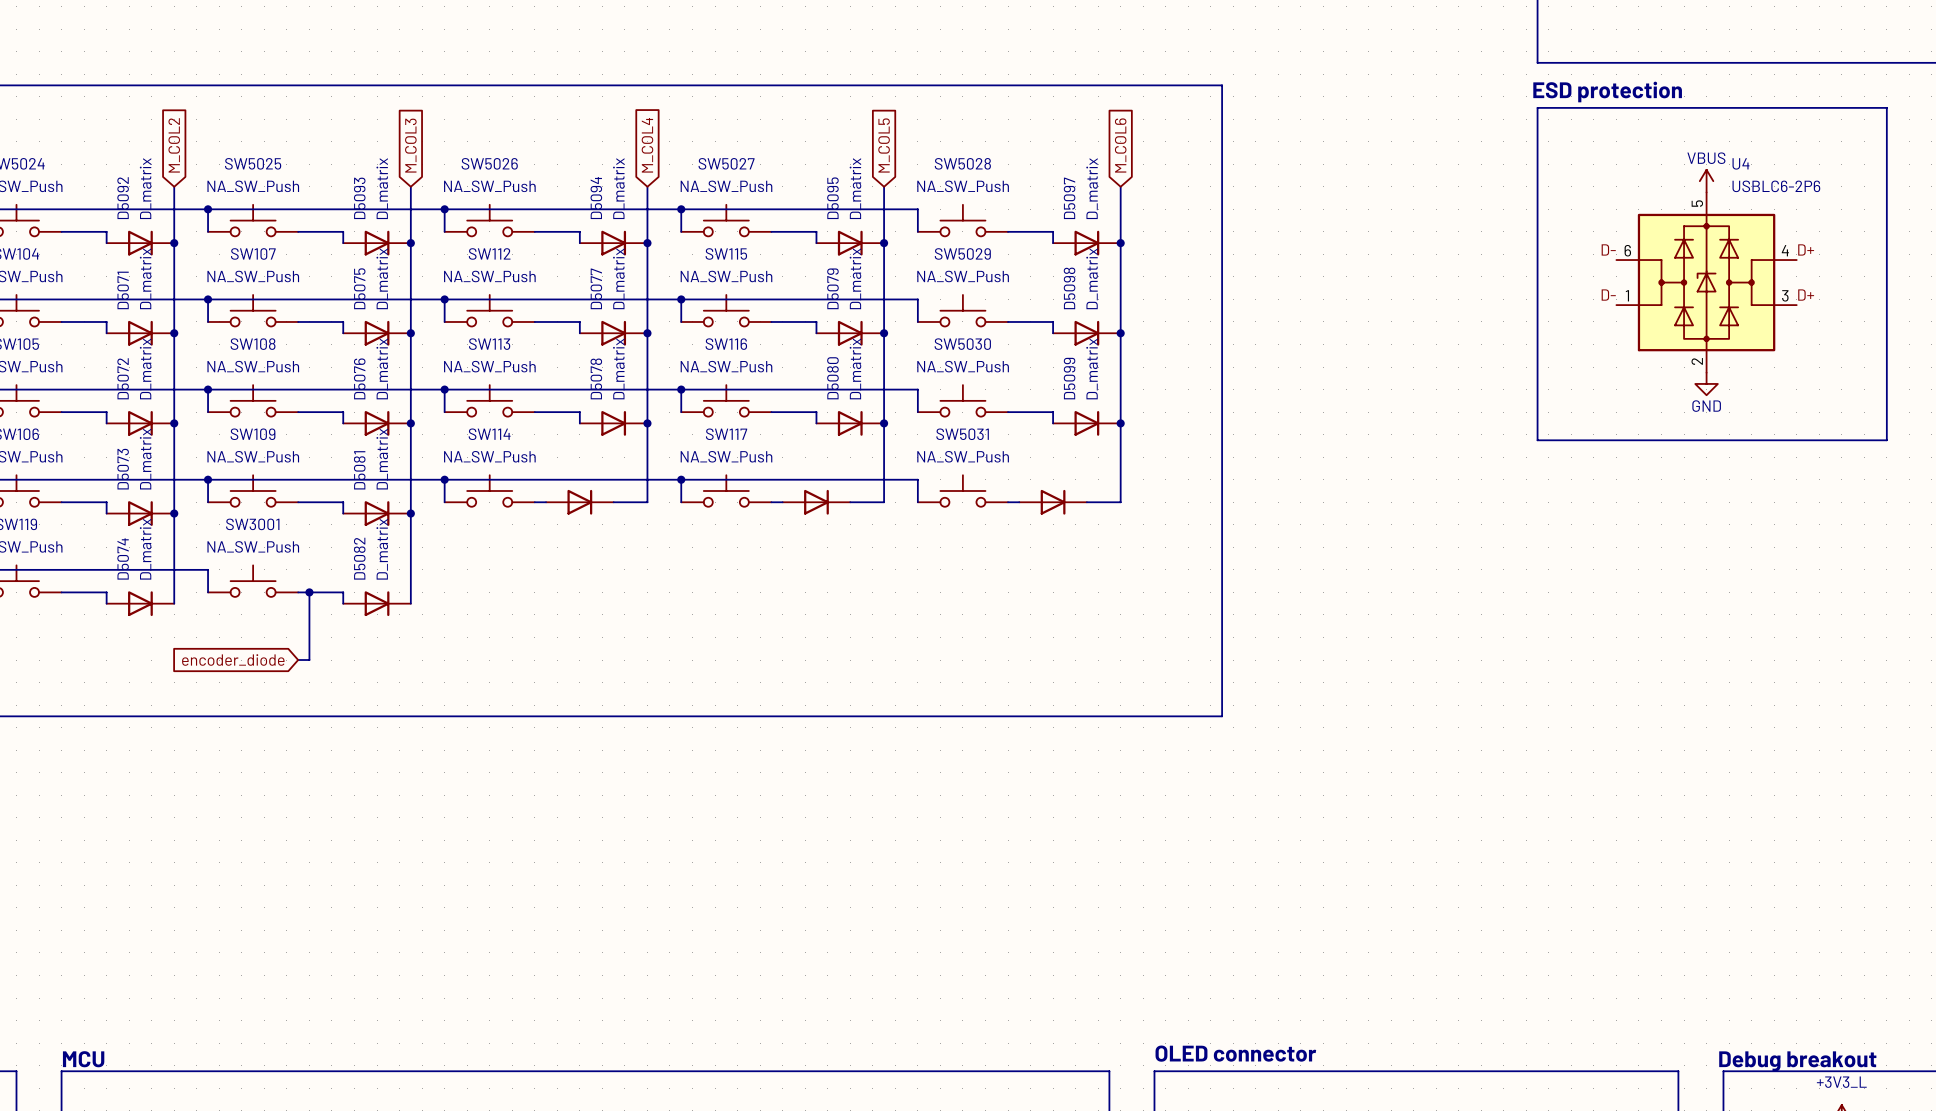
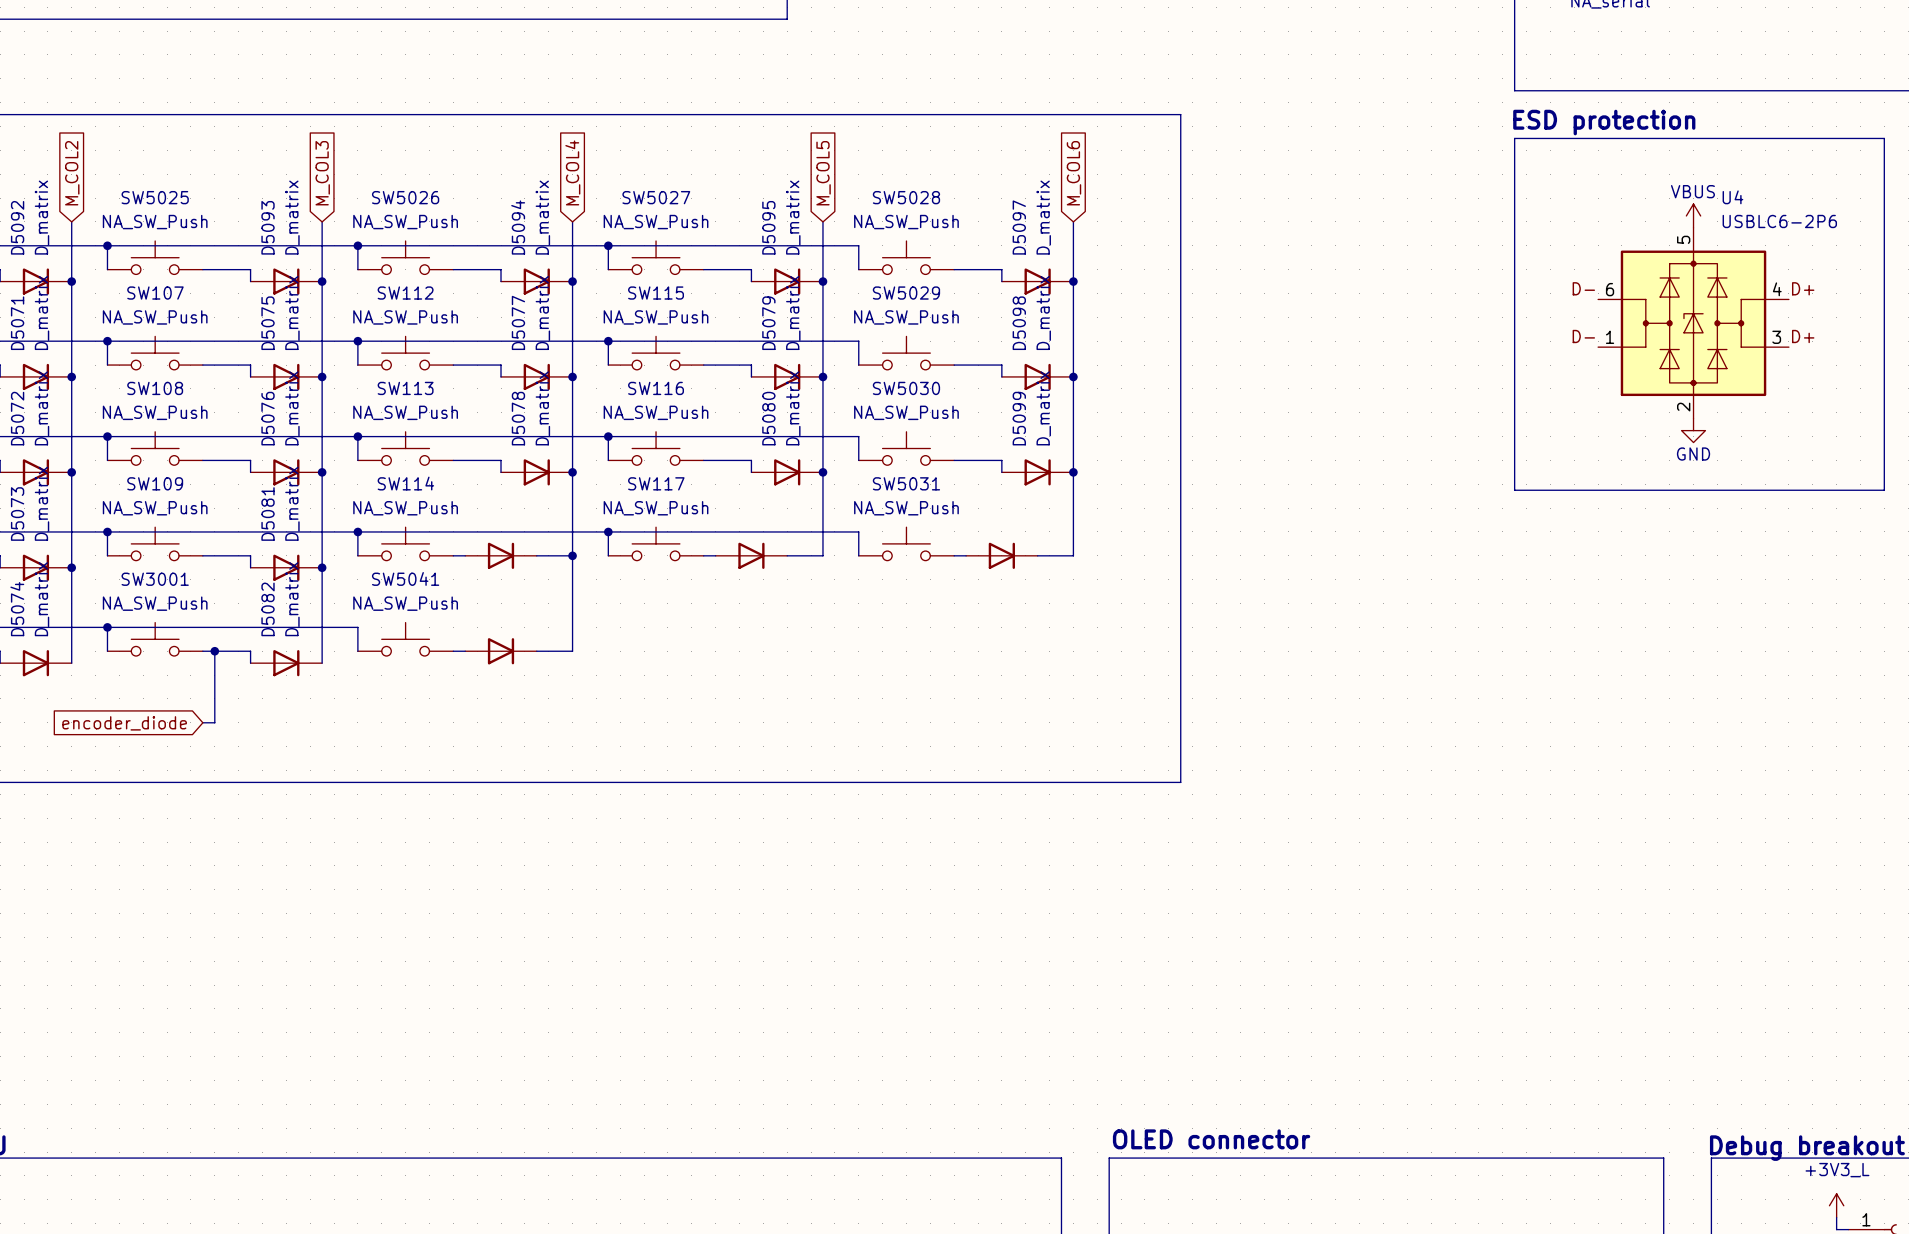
wire: none -> (572, 555) (572, 651) (536, 651)
junction: none -> (572, 555)
wire: none -> (107, 627) (357, 627) (357, 651)
junction: none -> (107, 627)
SW5041: none -> NA_SW_Push (405, 639)
wire: none -> (453, 651) (465, 651)
part: none -> (501, 651)

